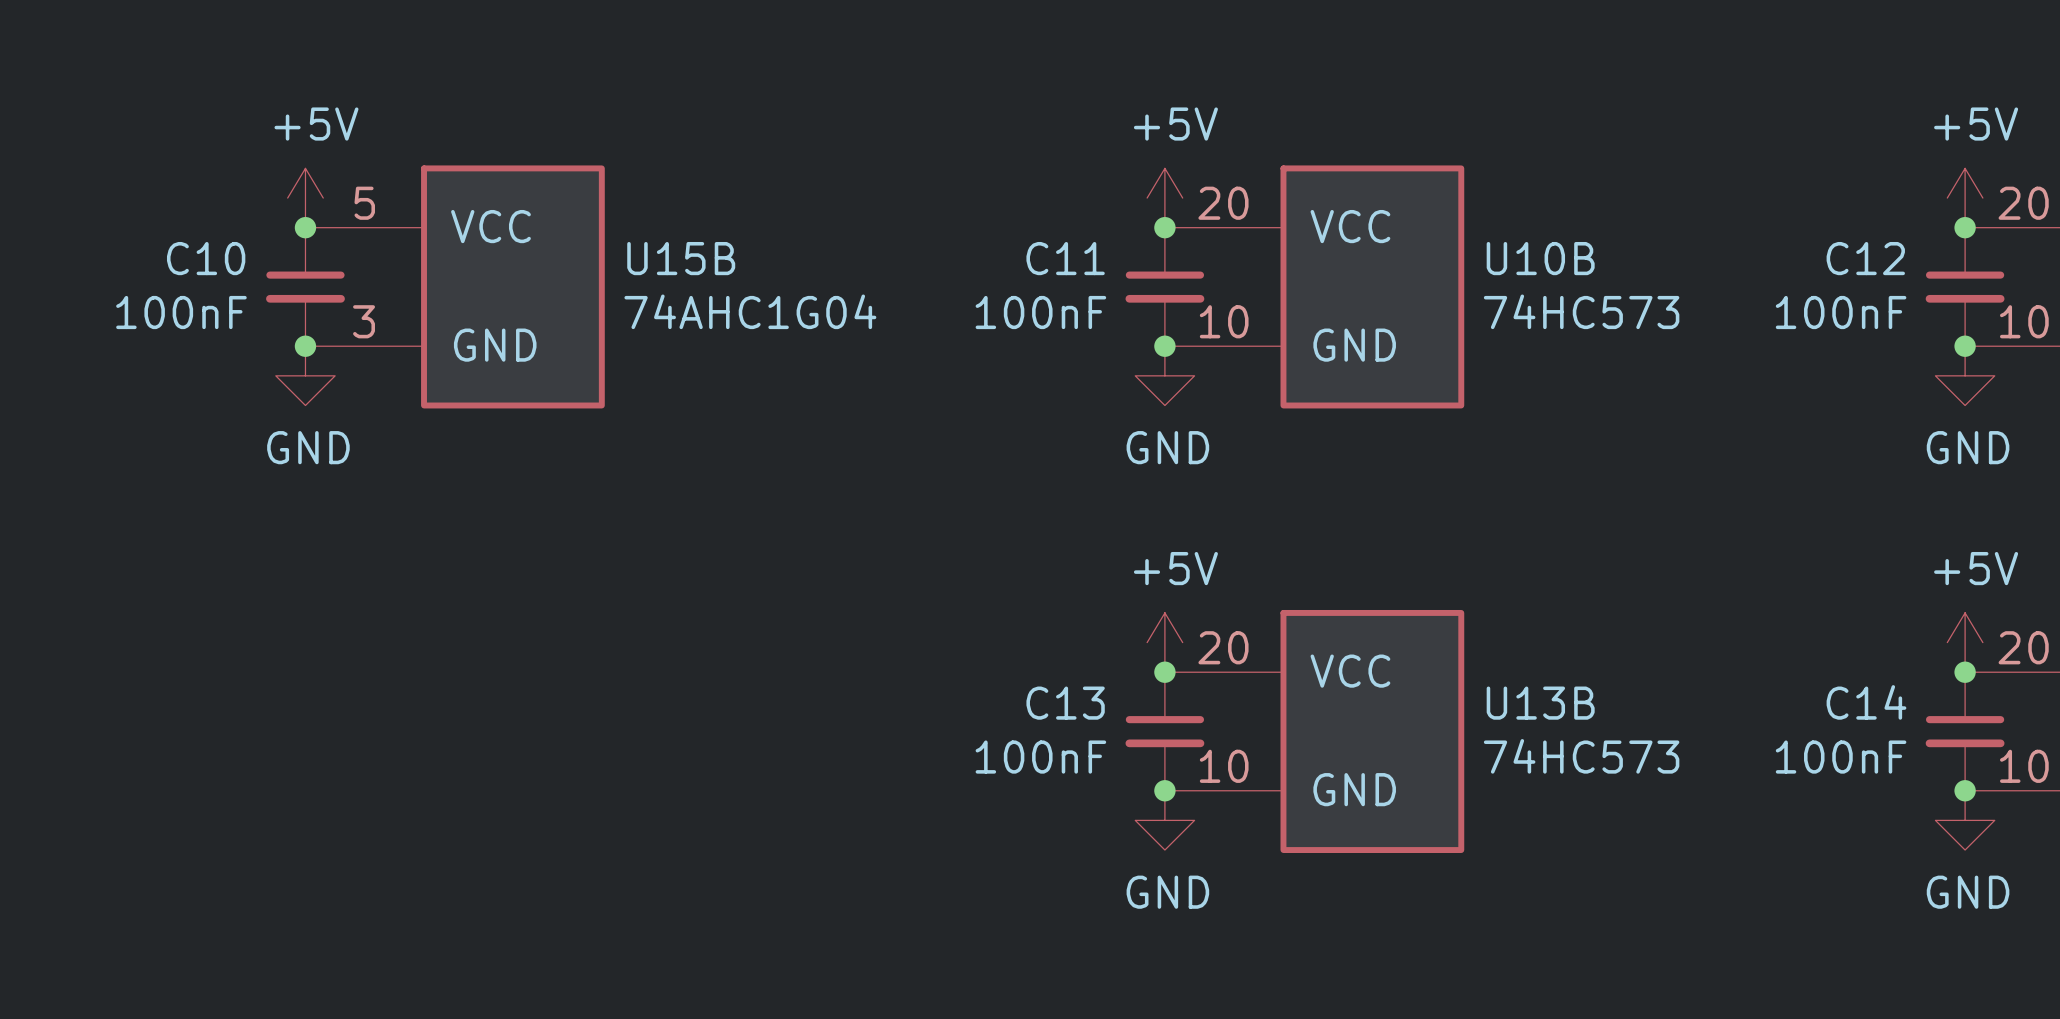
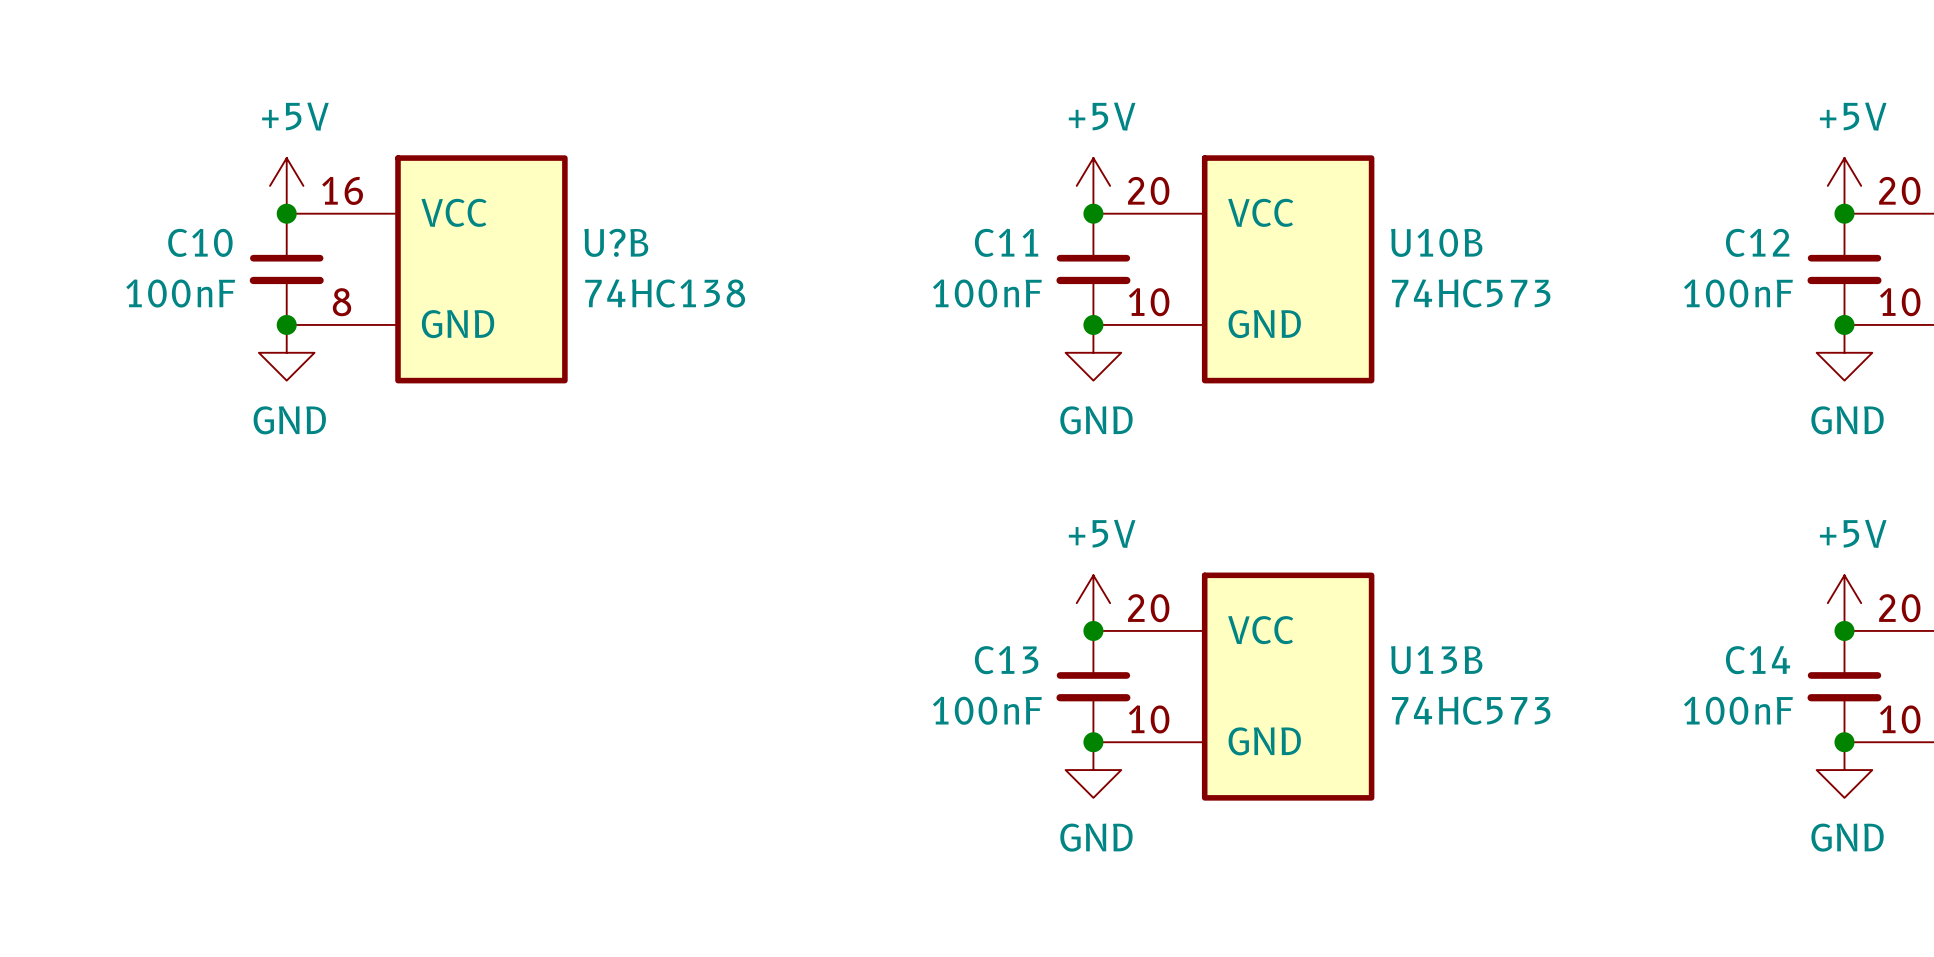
U15B pin number: 5 (364, 203) -> 16 (342, 190)
U15B name: U15B (681, 258) -> U?B (616, 242)
U15B value: 74AHC1G04 (750, 311) -> 74HC138 (665, 293)
U15B pin number: 3 (364, 321) -> 8 (342, 302)

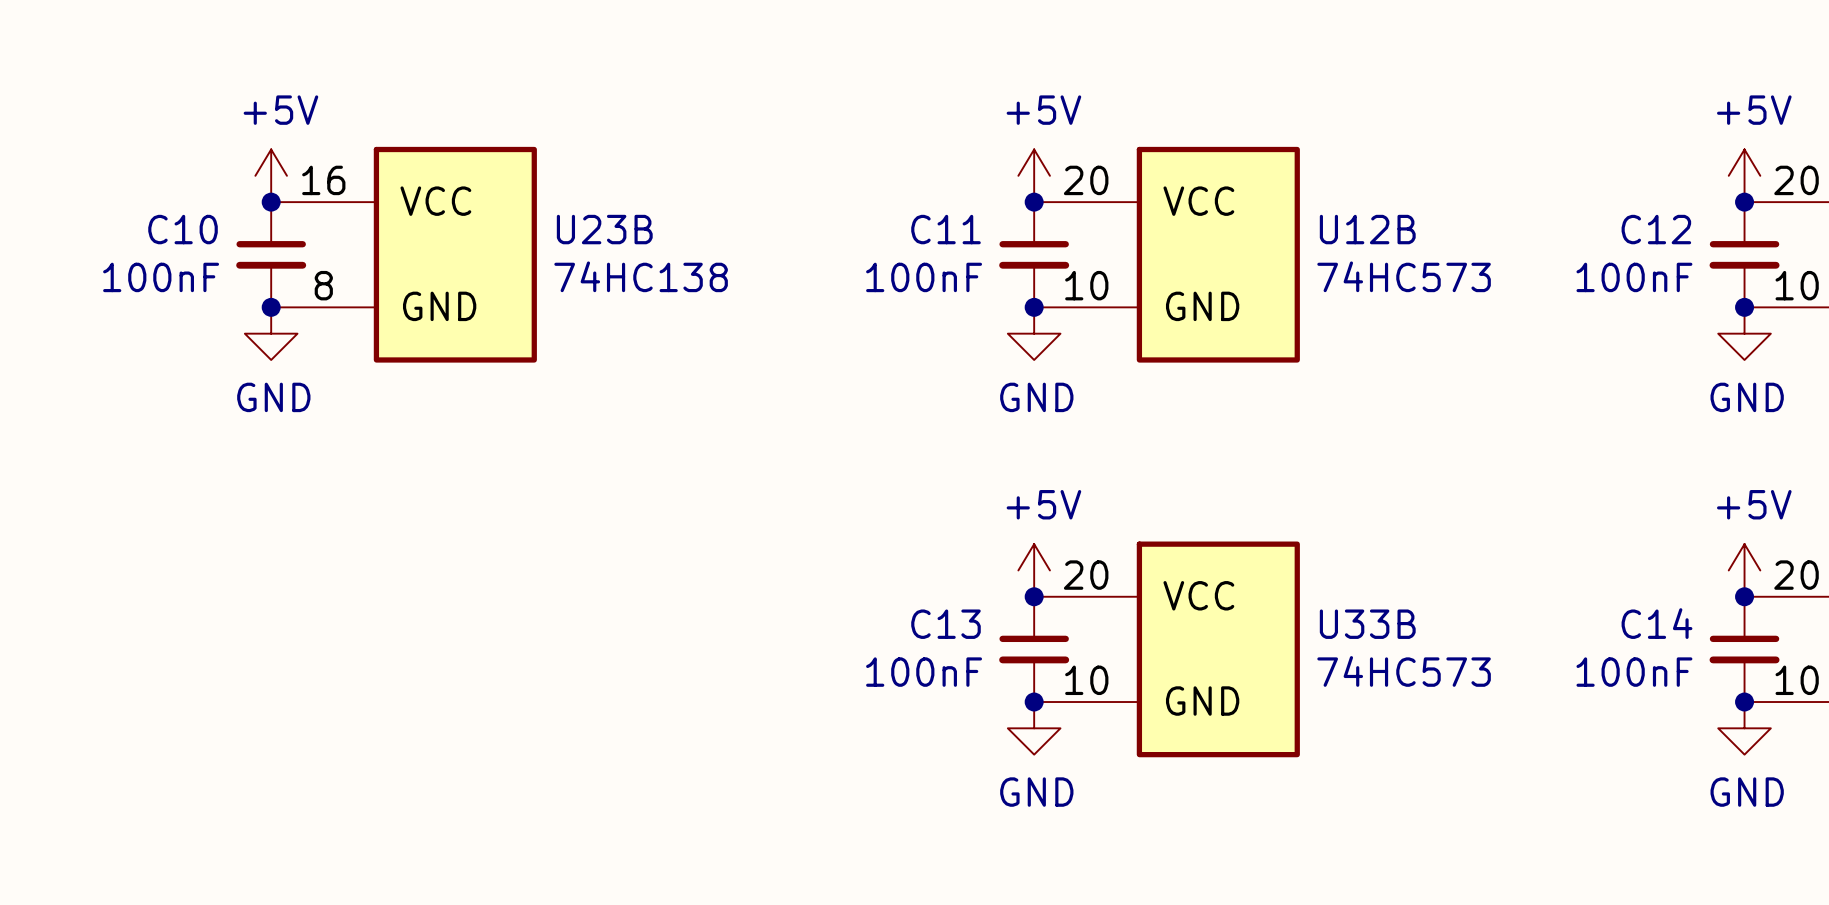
U?B name: U?B (616, 242) -> U23B (604, 229)
U10B name: U10B (1436, 242) -> U12B (1367, 229)
U13B name: U13B (1436, 660) -> U33B (1367, 624)

